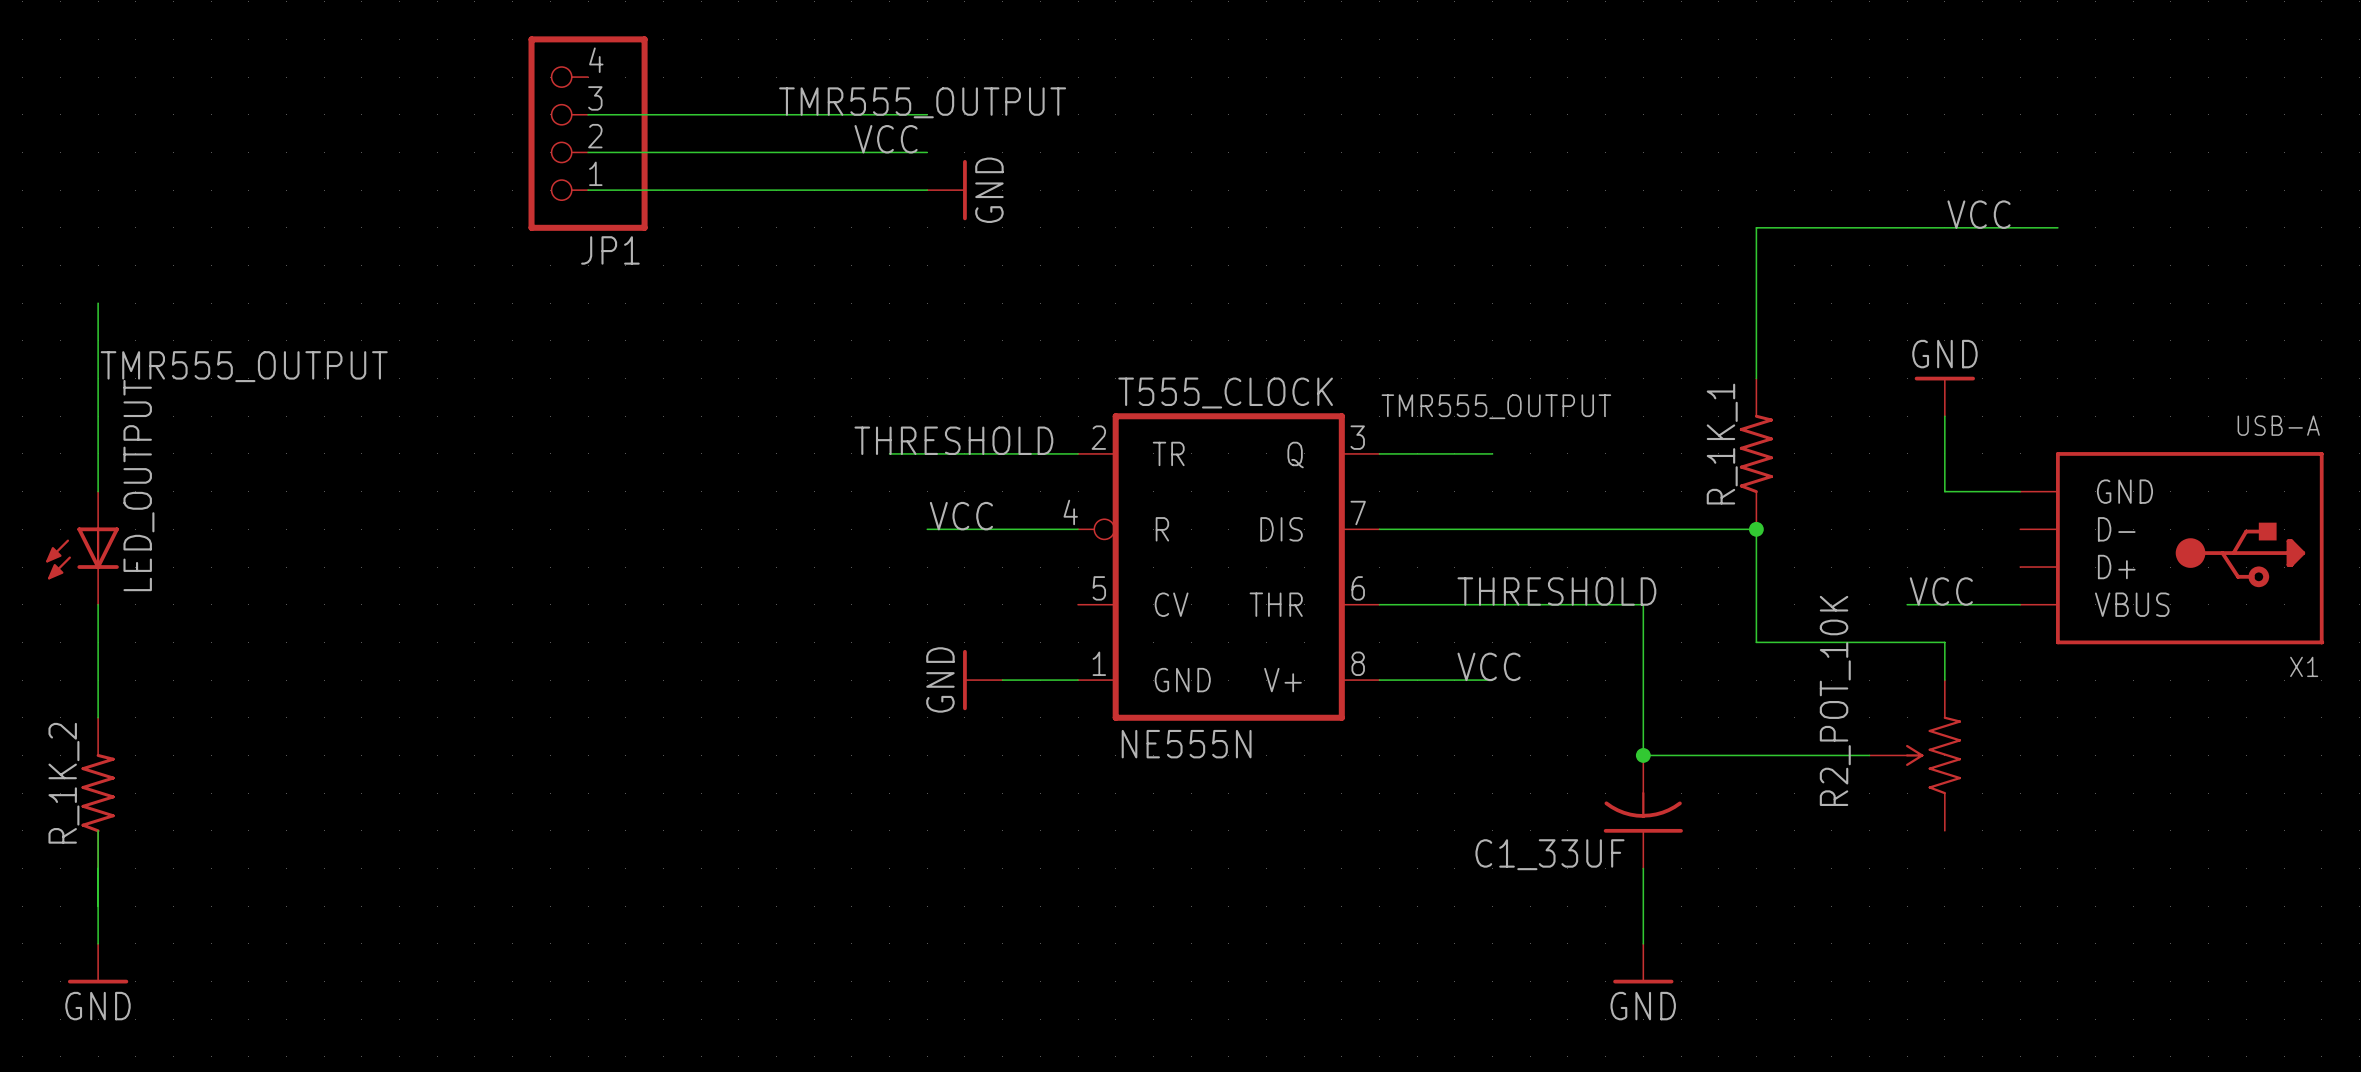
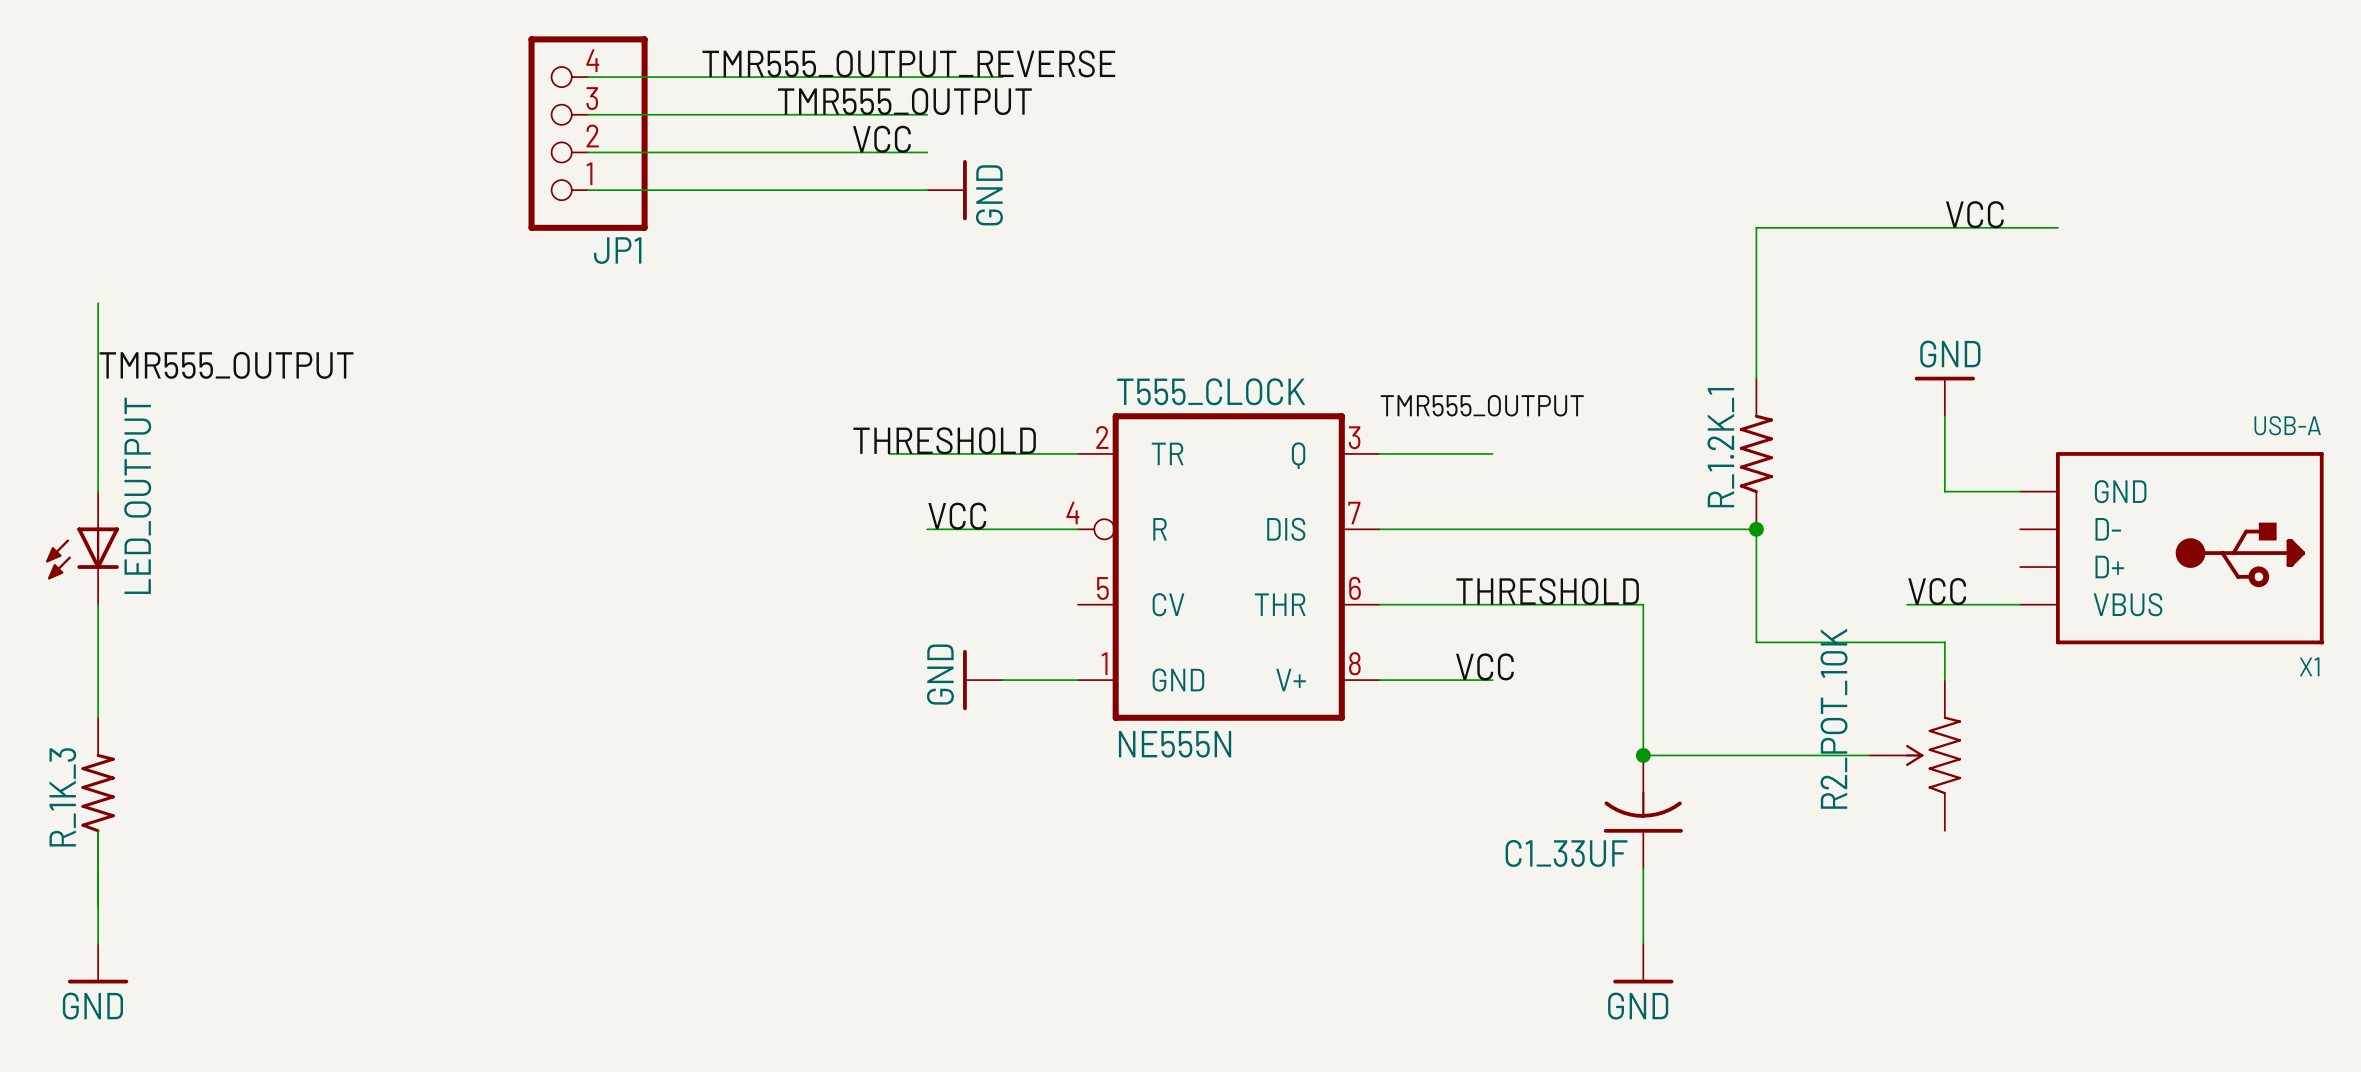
label: none -> TMR555_OUTPUT_REVERSE (908, 63)
wire: none -> (588, 77) (1002, 77)
R_1K_1 name: R_1K_1 (1722, 444) -> R_1.2K_1 (1720, 447)
R_1K_2 name: R_1K_2 (63, 783) -> R_1K_3 (62, 797)

